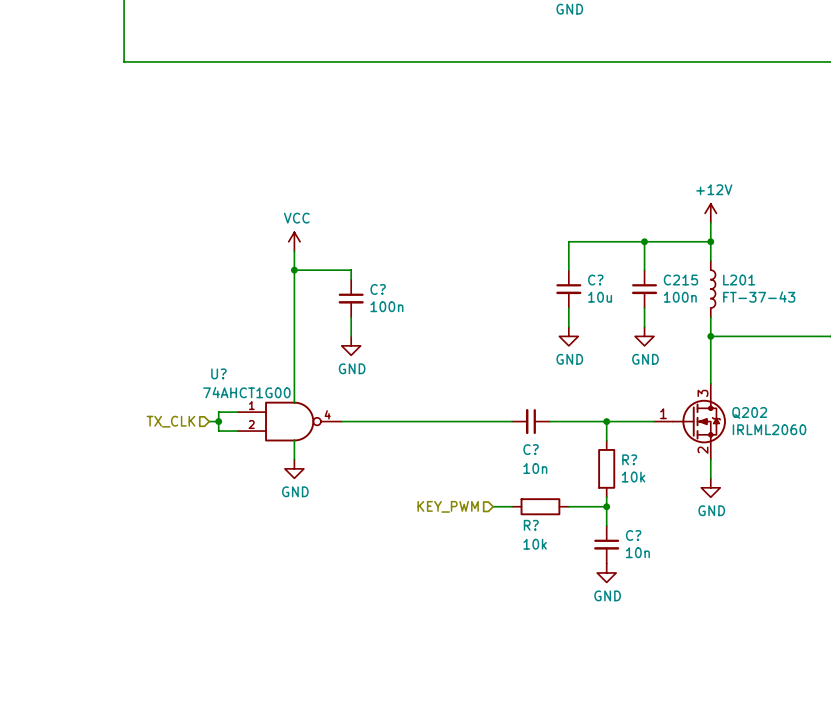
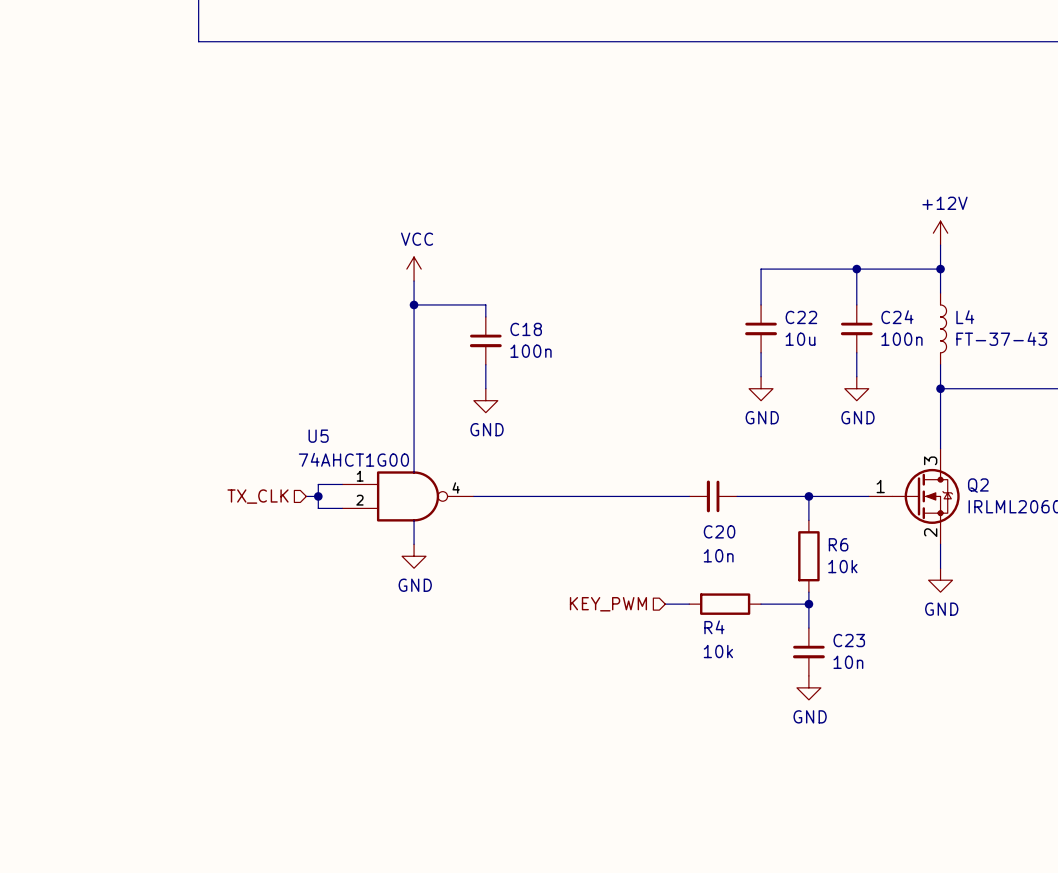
C? name: C? (595, 280) -> C22 (801, 317)
C215 name: C215 (680, 280) -> C24 (897, 317)
L201 name: L201 (739, 280) -> L4 (965, 317)
C? name: C? (378, 289) -> C18 (526, 329)
U? name: U? (218, 373) -> U5 (318, 436)
Q202 name: Q202 (749, 412) -> Q2 (978, 485)
C? name: C? (531, 449) -> C20 (719, 531)
R? name: R? (629, 459) -> R6 (838, 544)
R? name: R? (531, 525) -> R4 (714, 627)
C? name: C? (633, 535) -> C23 (849, 640)

